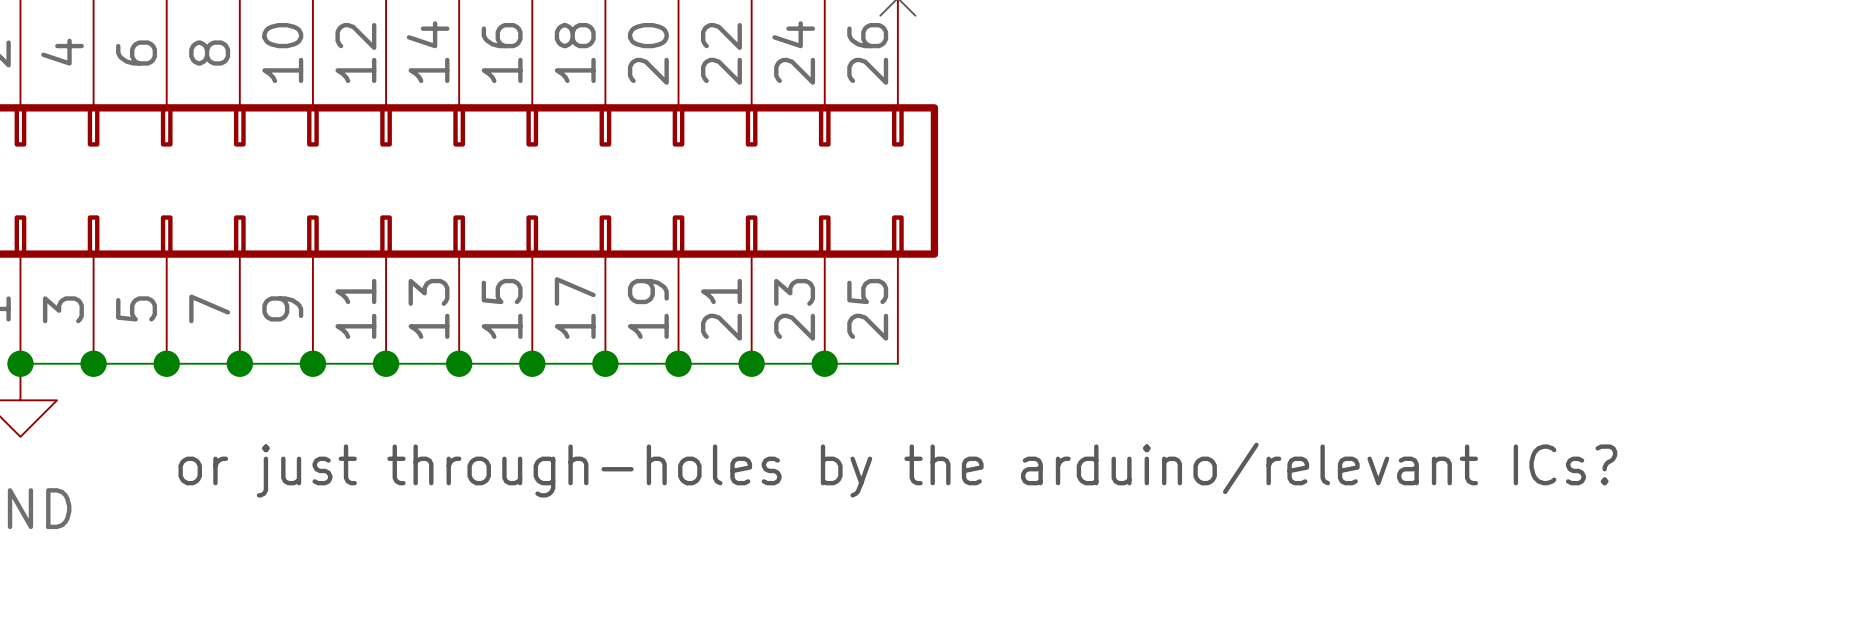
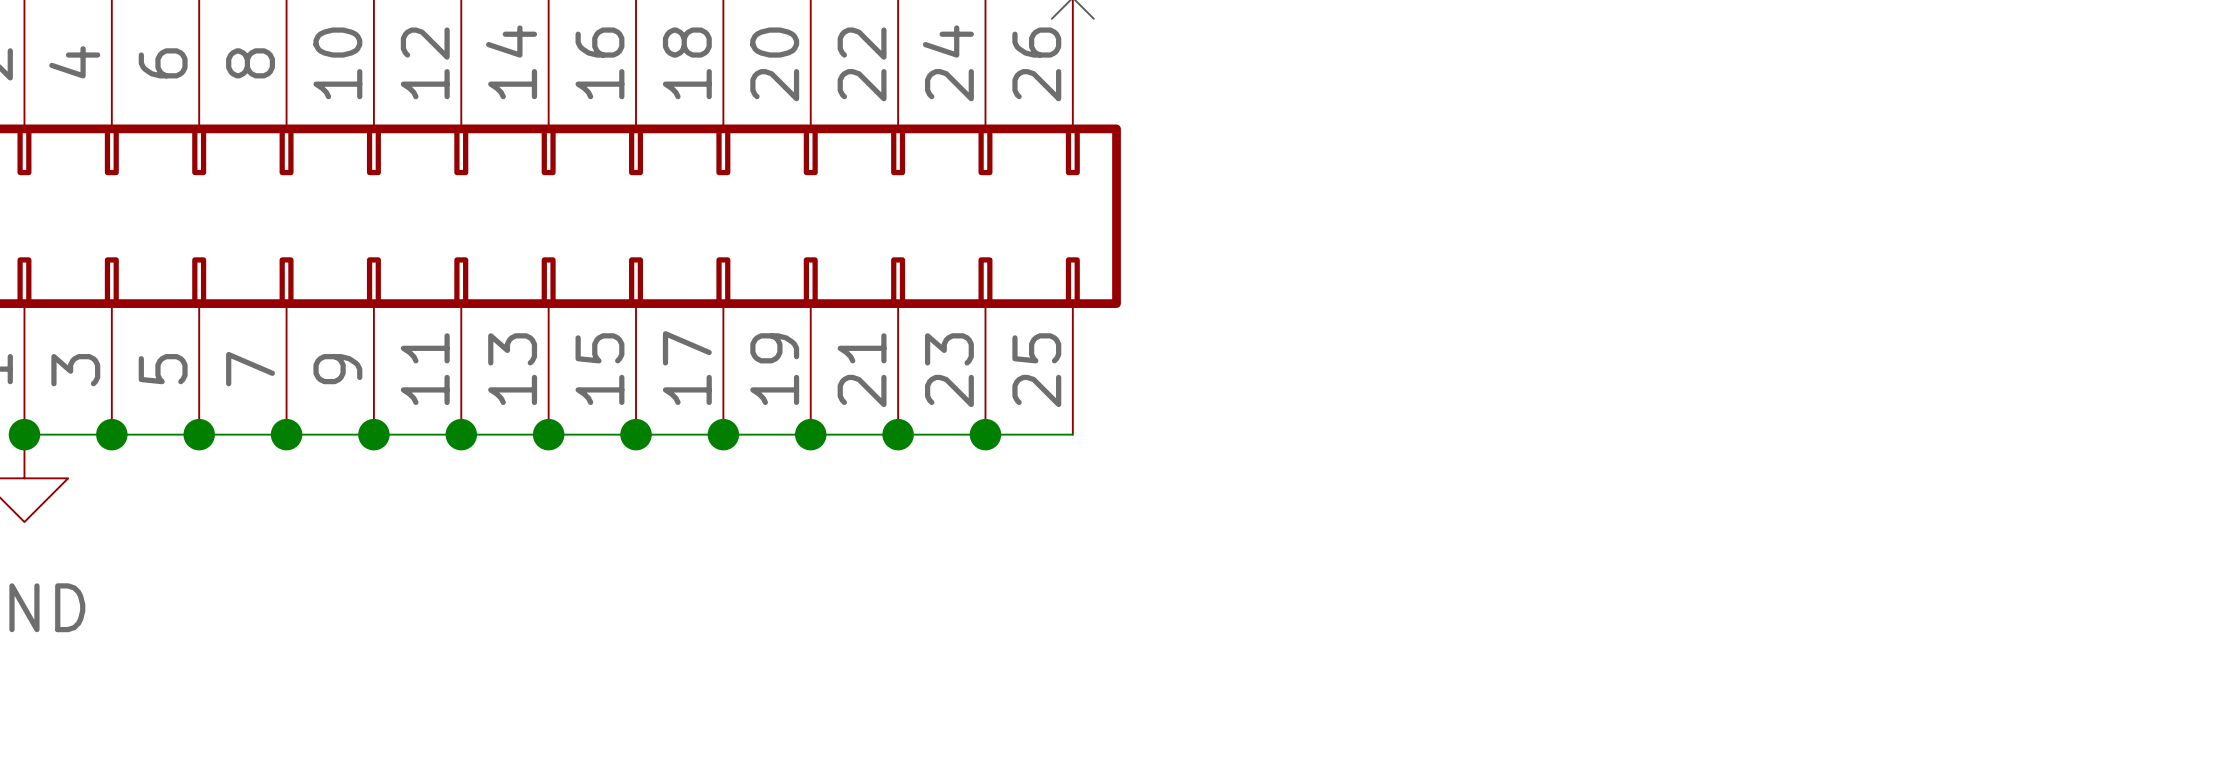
text: or just through-holes by the arduino/relevant ICs? (897, 470) -> none

